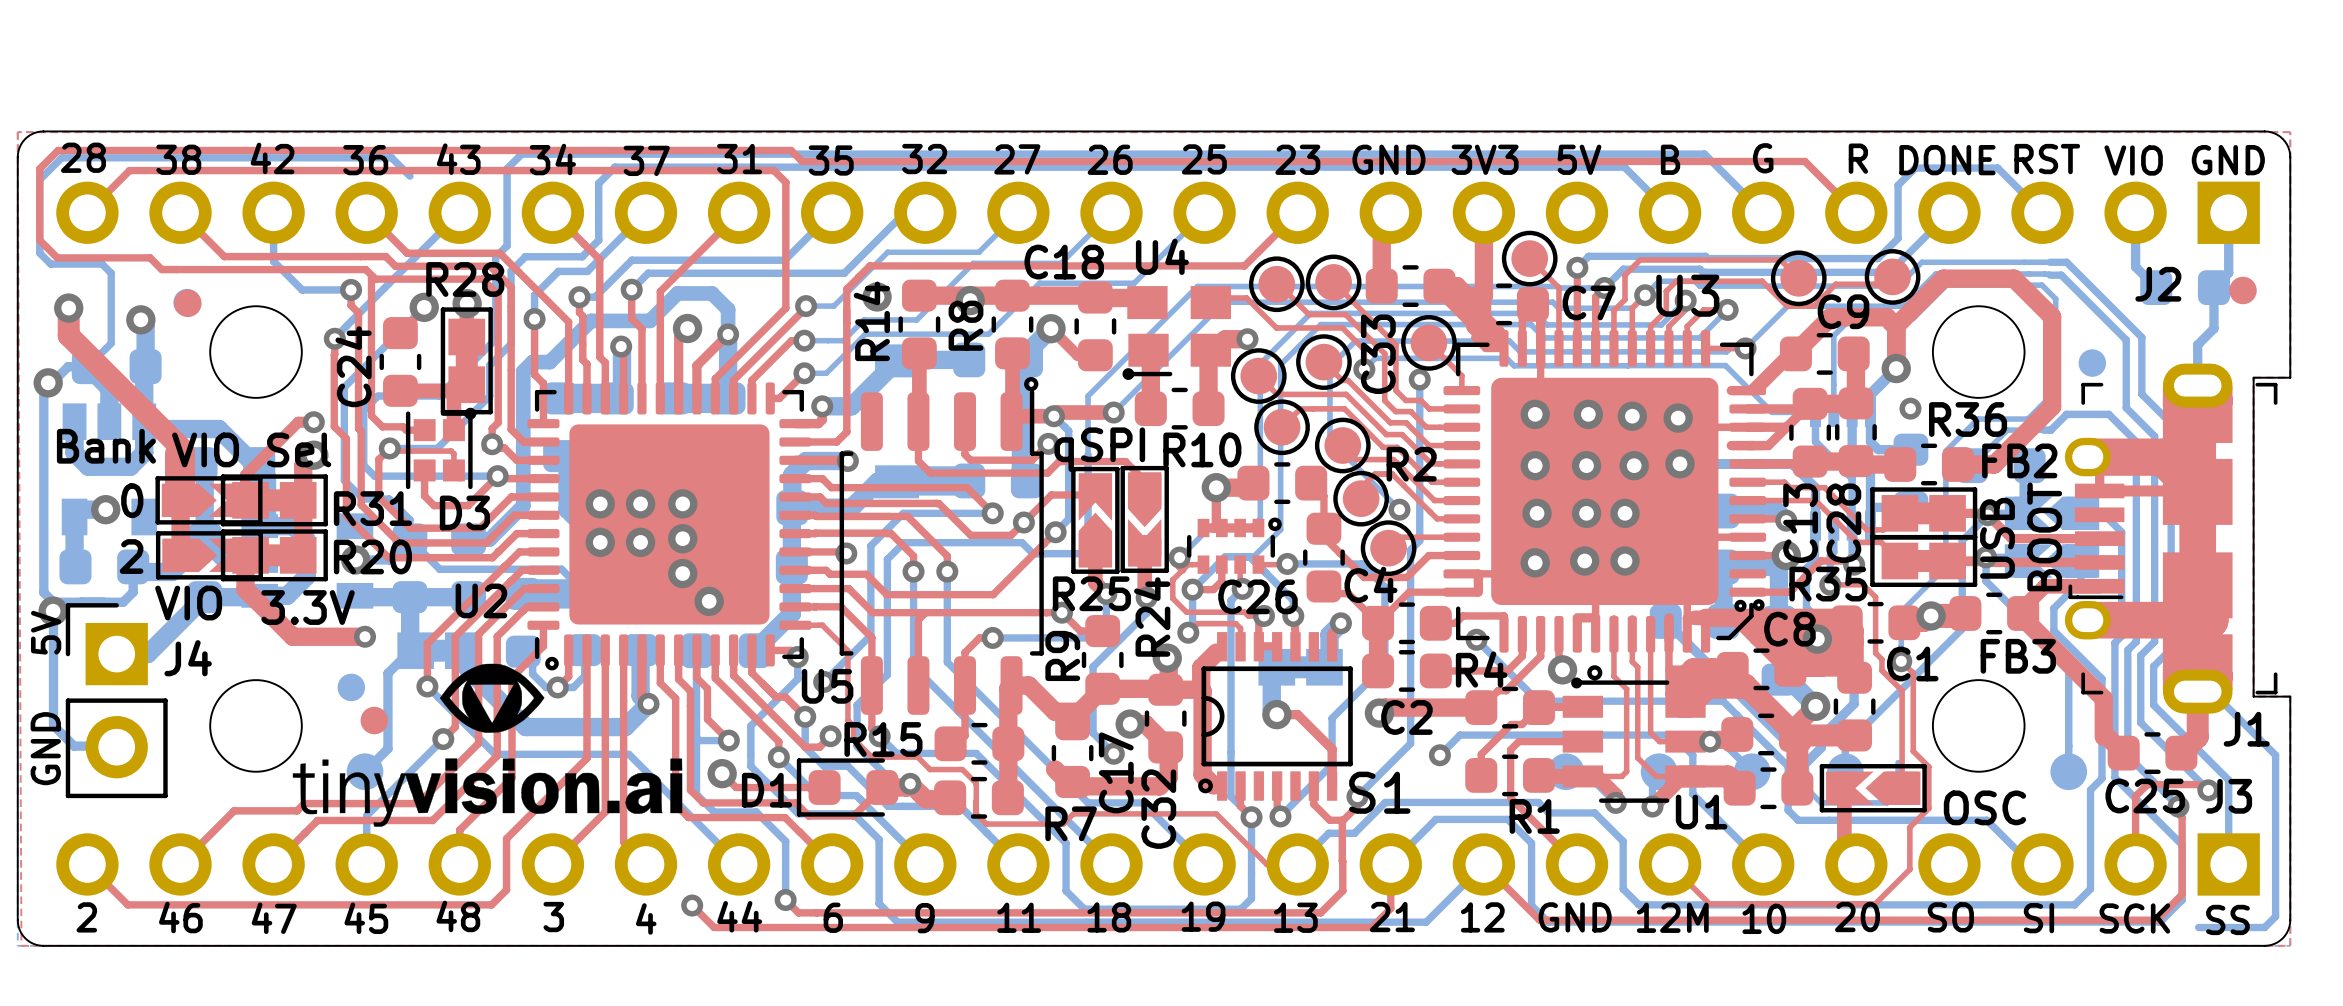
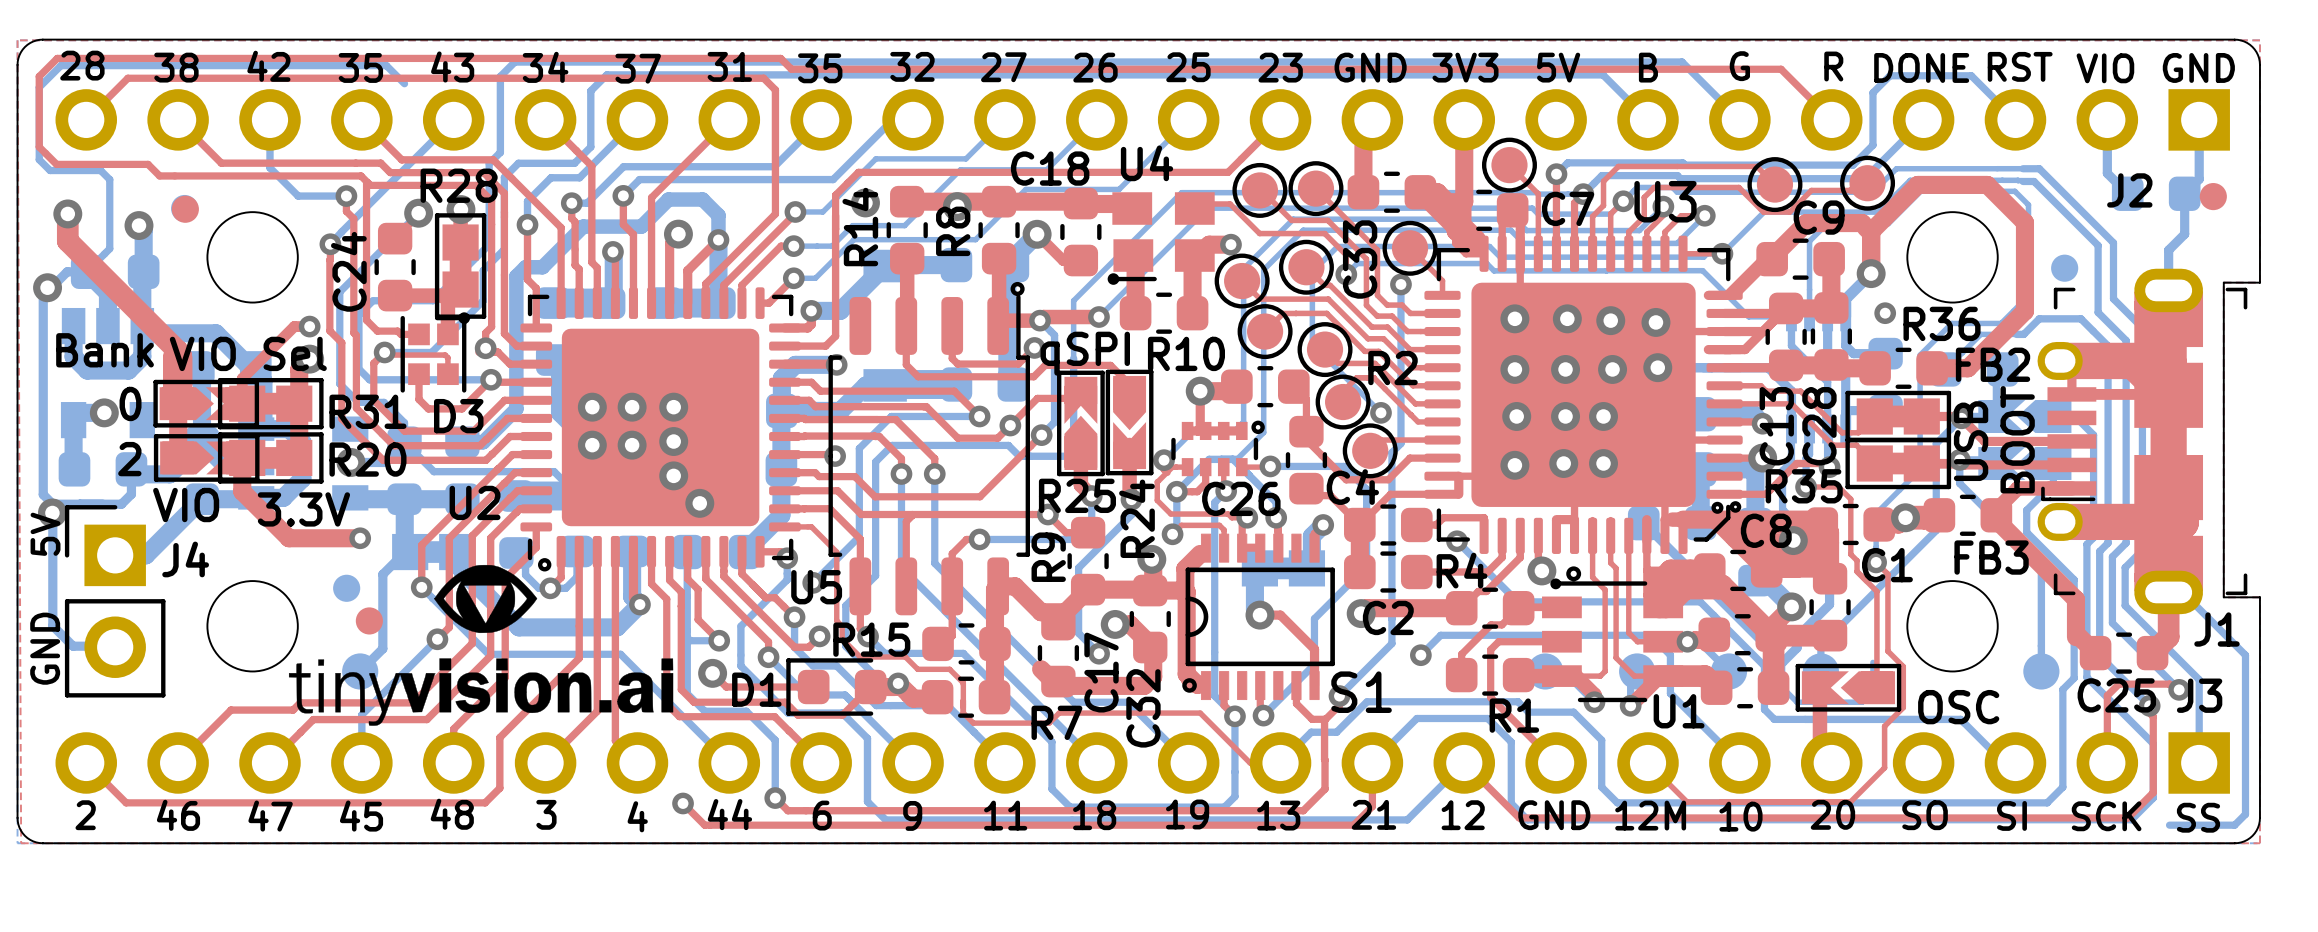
text: 36 (365, 160) -> 35 (360, 67)

